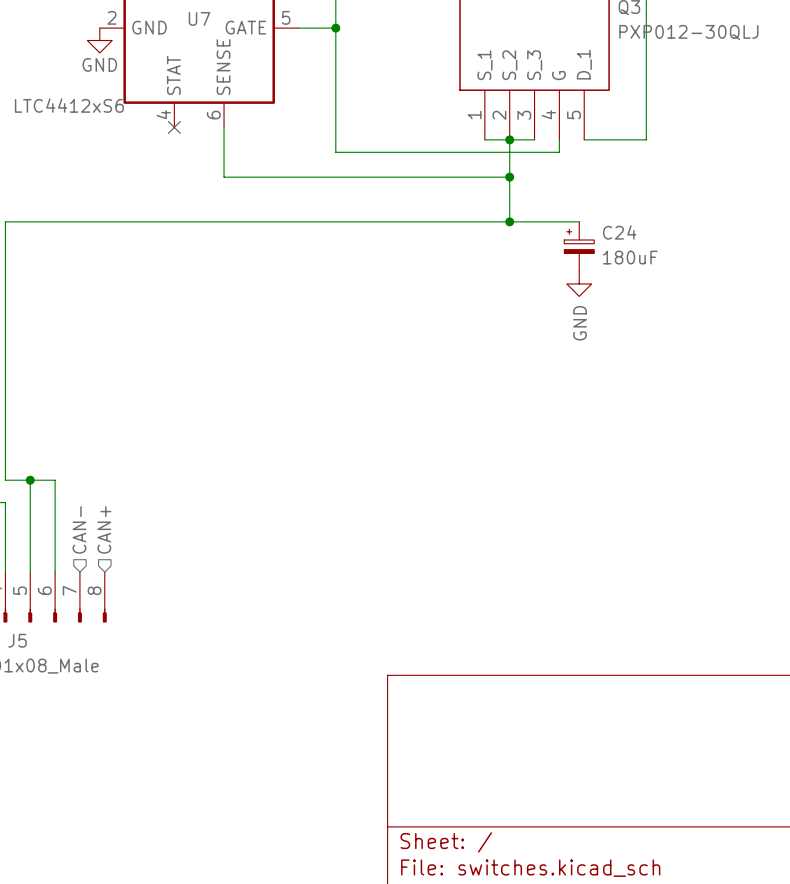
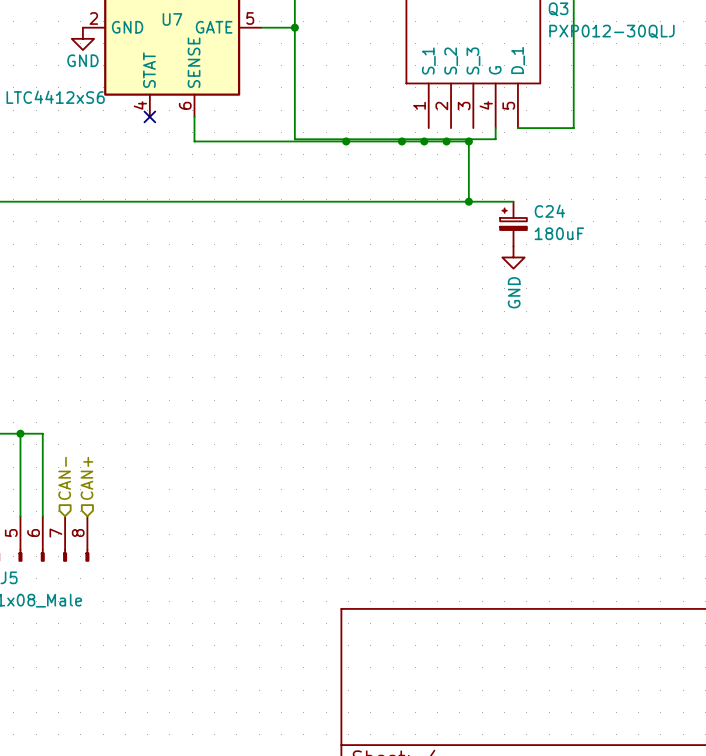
wire: (484, 139) (534, 139) -> none
wire: (509, 139) (509, 221) -> none
junction: (509, 139) -> none
wire: (224, 154) (224, 177) (509, 177) -> (194, 141) (468, 141) (468, 201)
junction: none -> (346, 141)
junction: none -> (401, 141)
junction: none -> (424, 141)
junction: none -> (446, 141)
junction: none -> (468, 141)
junction: (509, 177) -> none
junction position: (509, 221) -> (468, 201)

